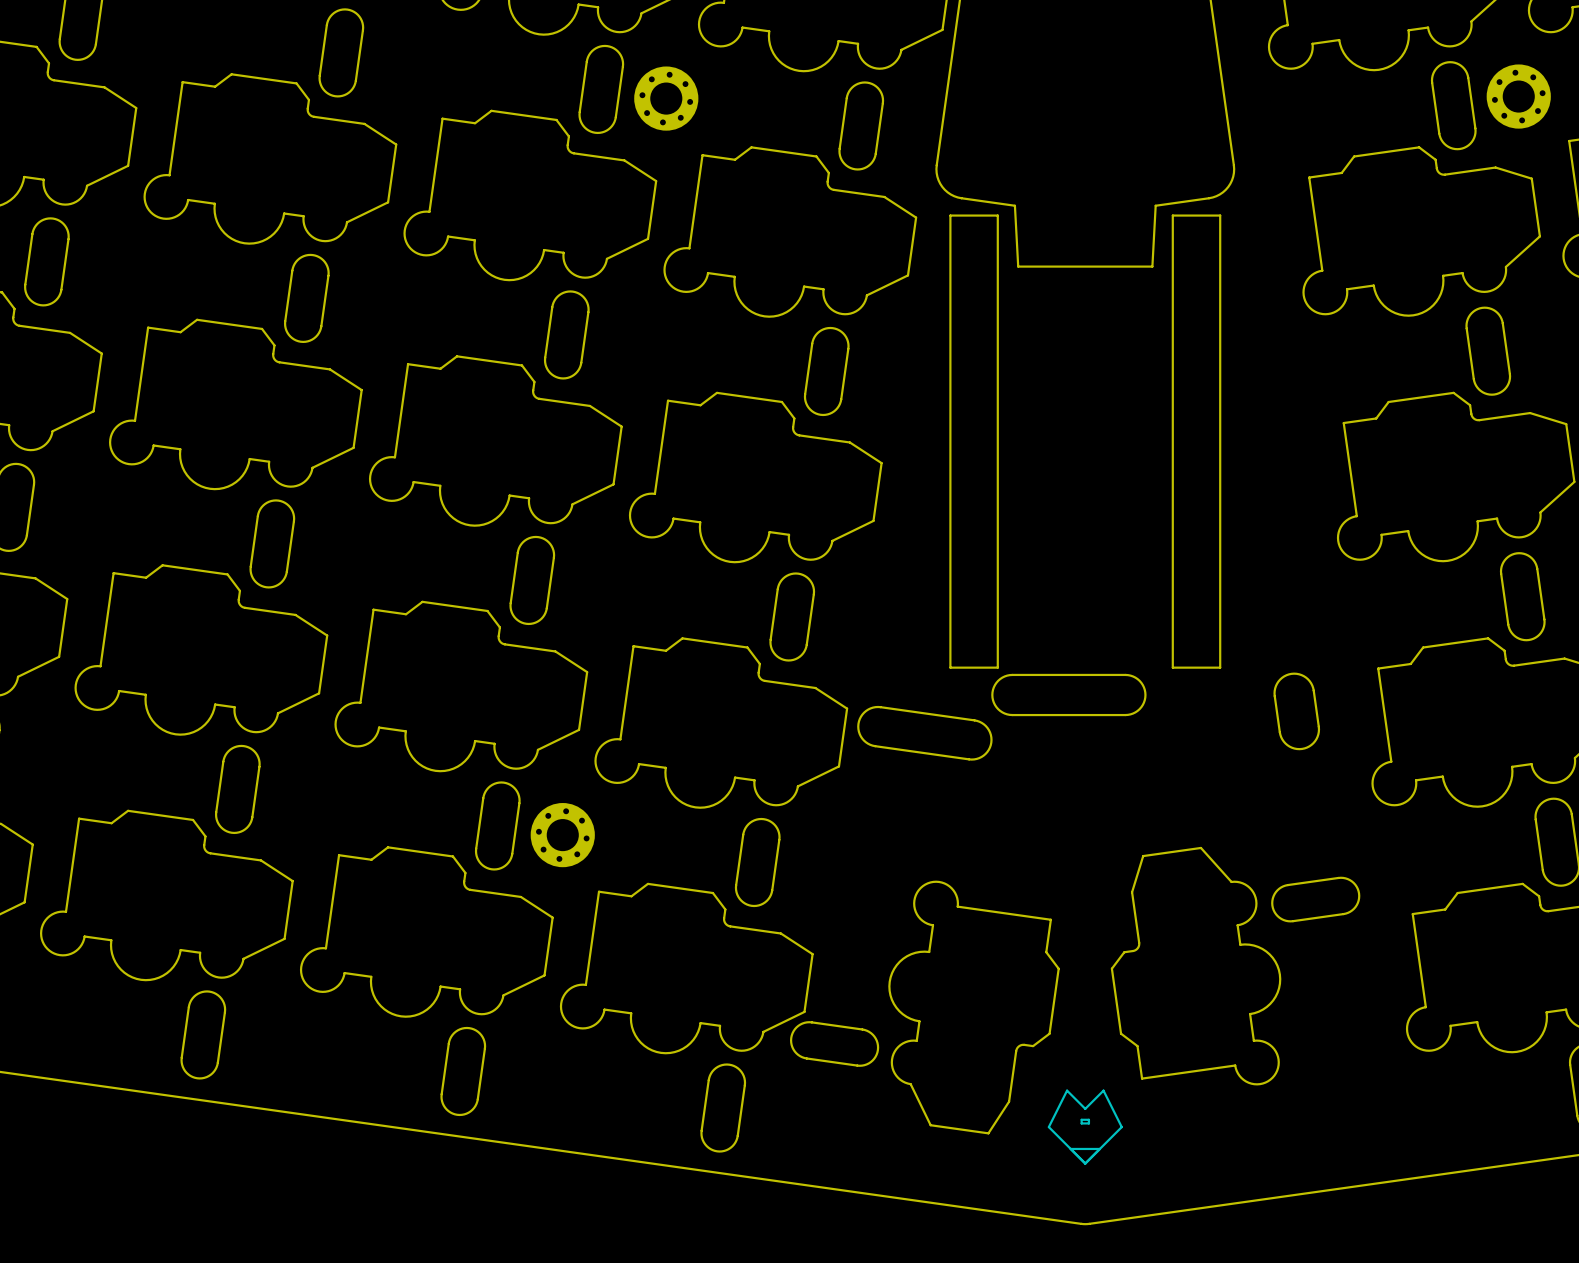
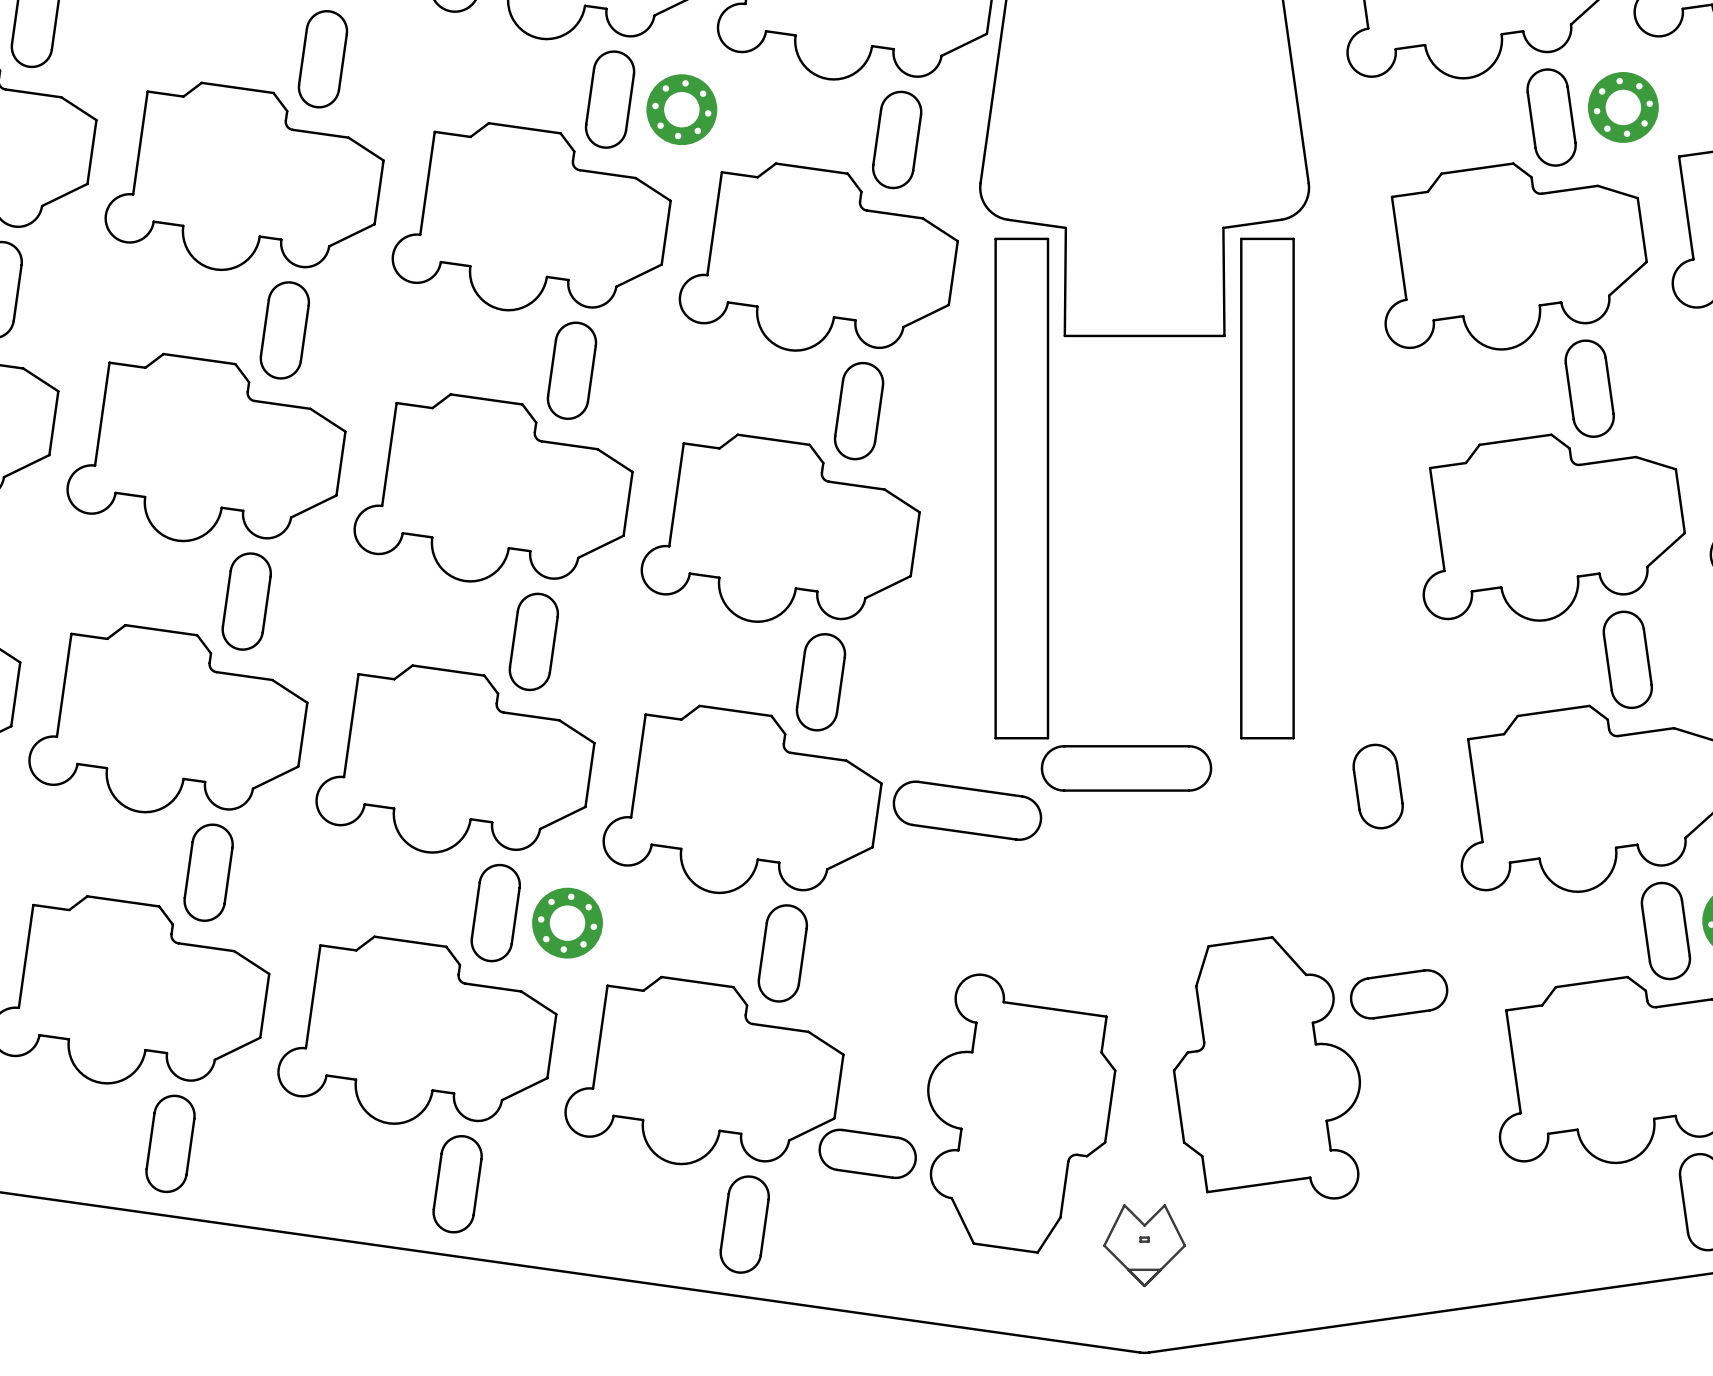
board edge: (1013, 205) (1018, 266) (1152, 266) (1156, 205) -> (1065, 227) (1064, 335) (1224, 335) (1223, 227)

